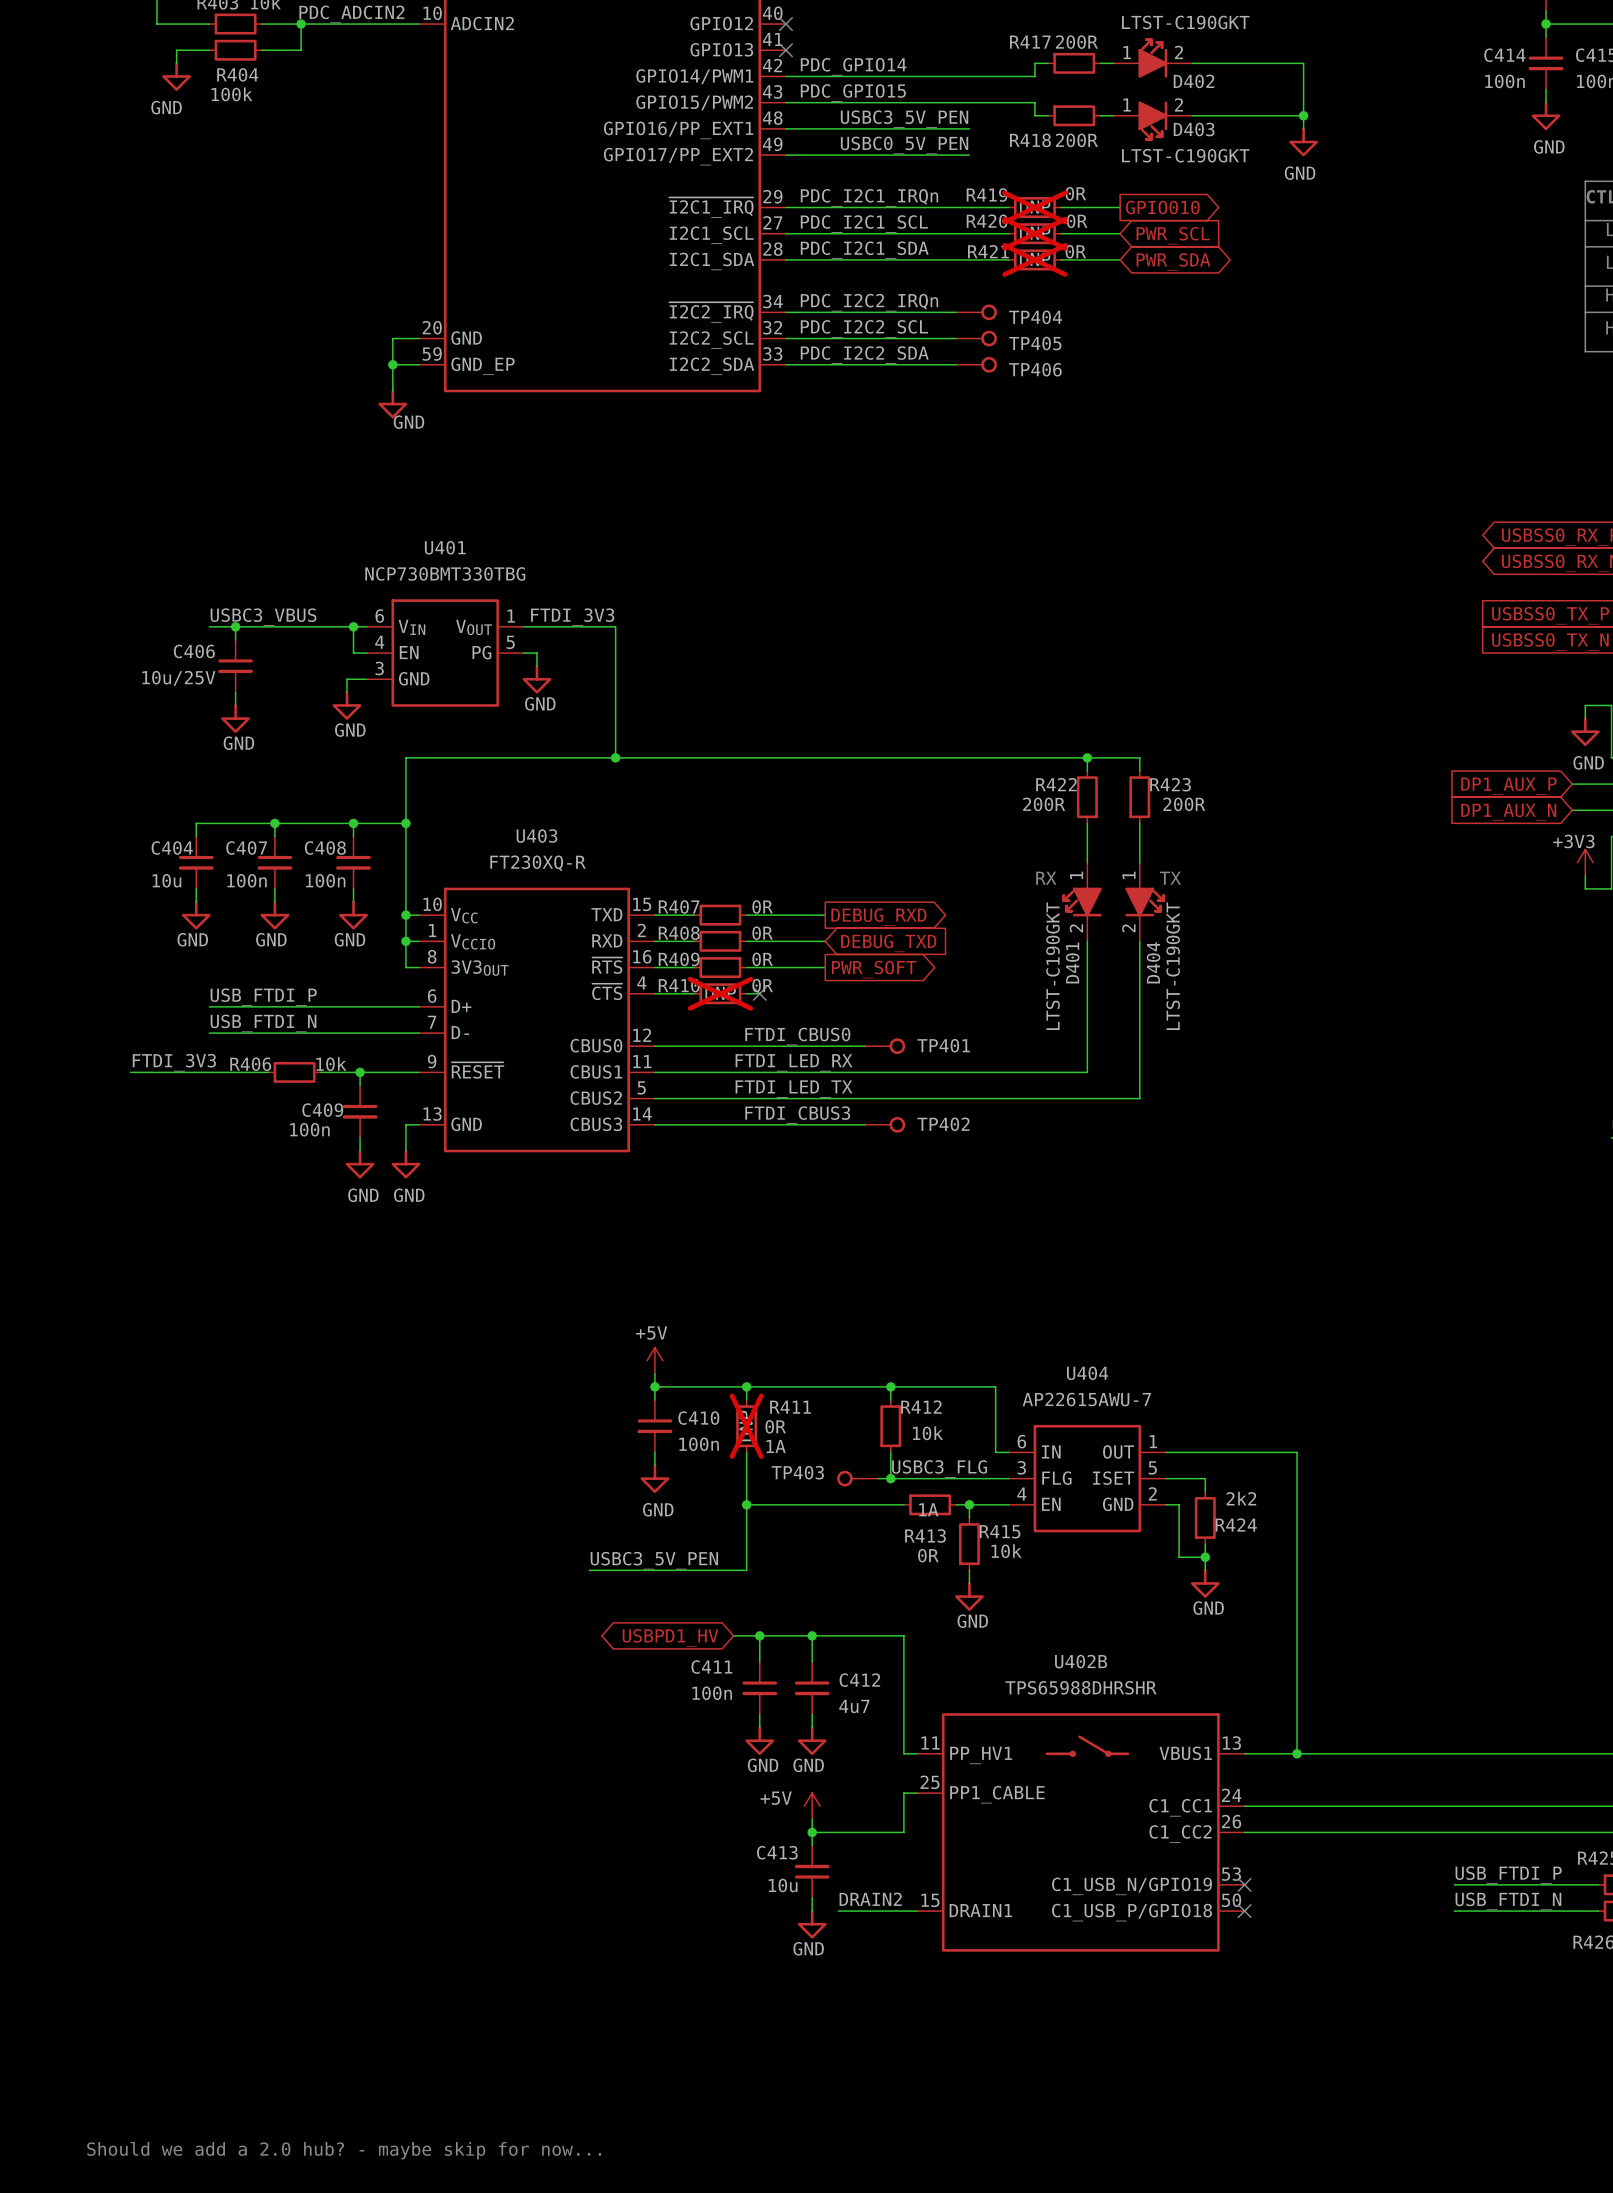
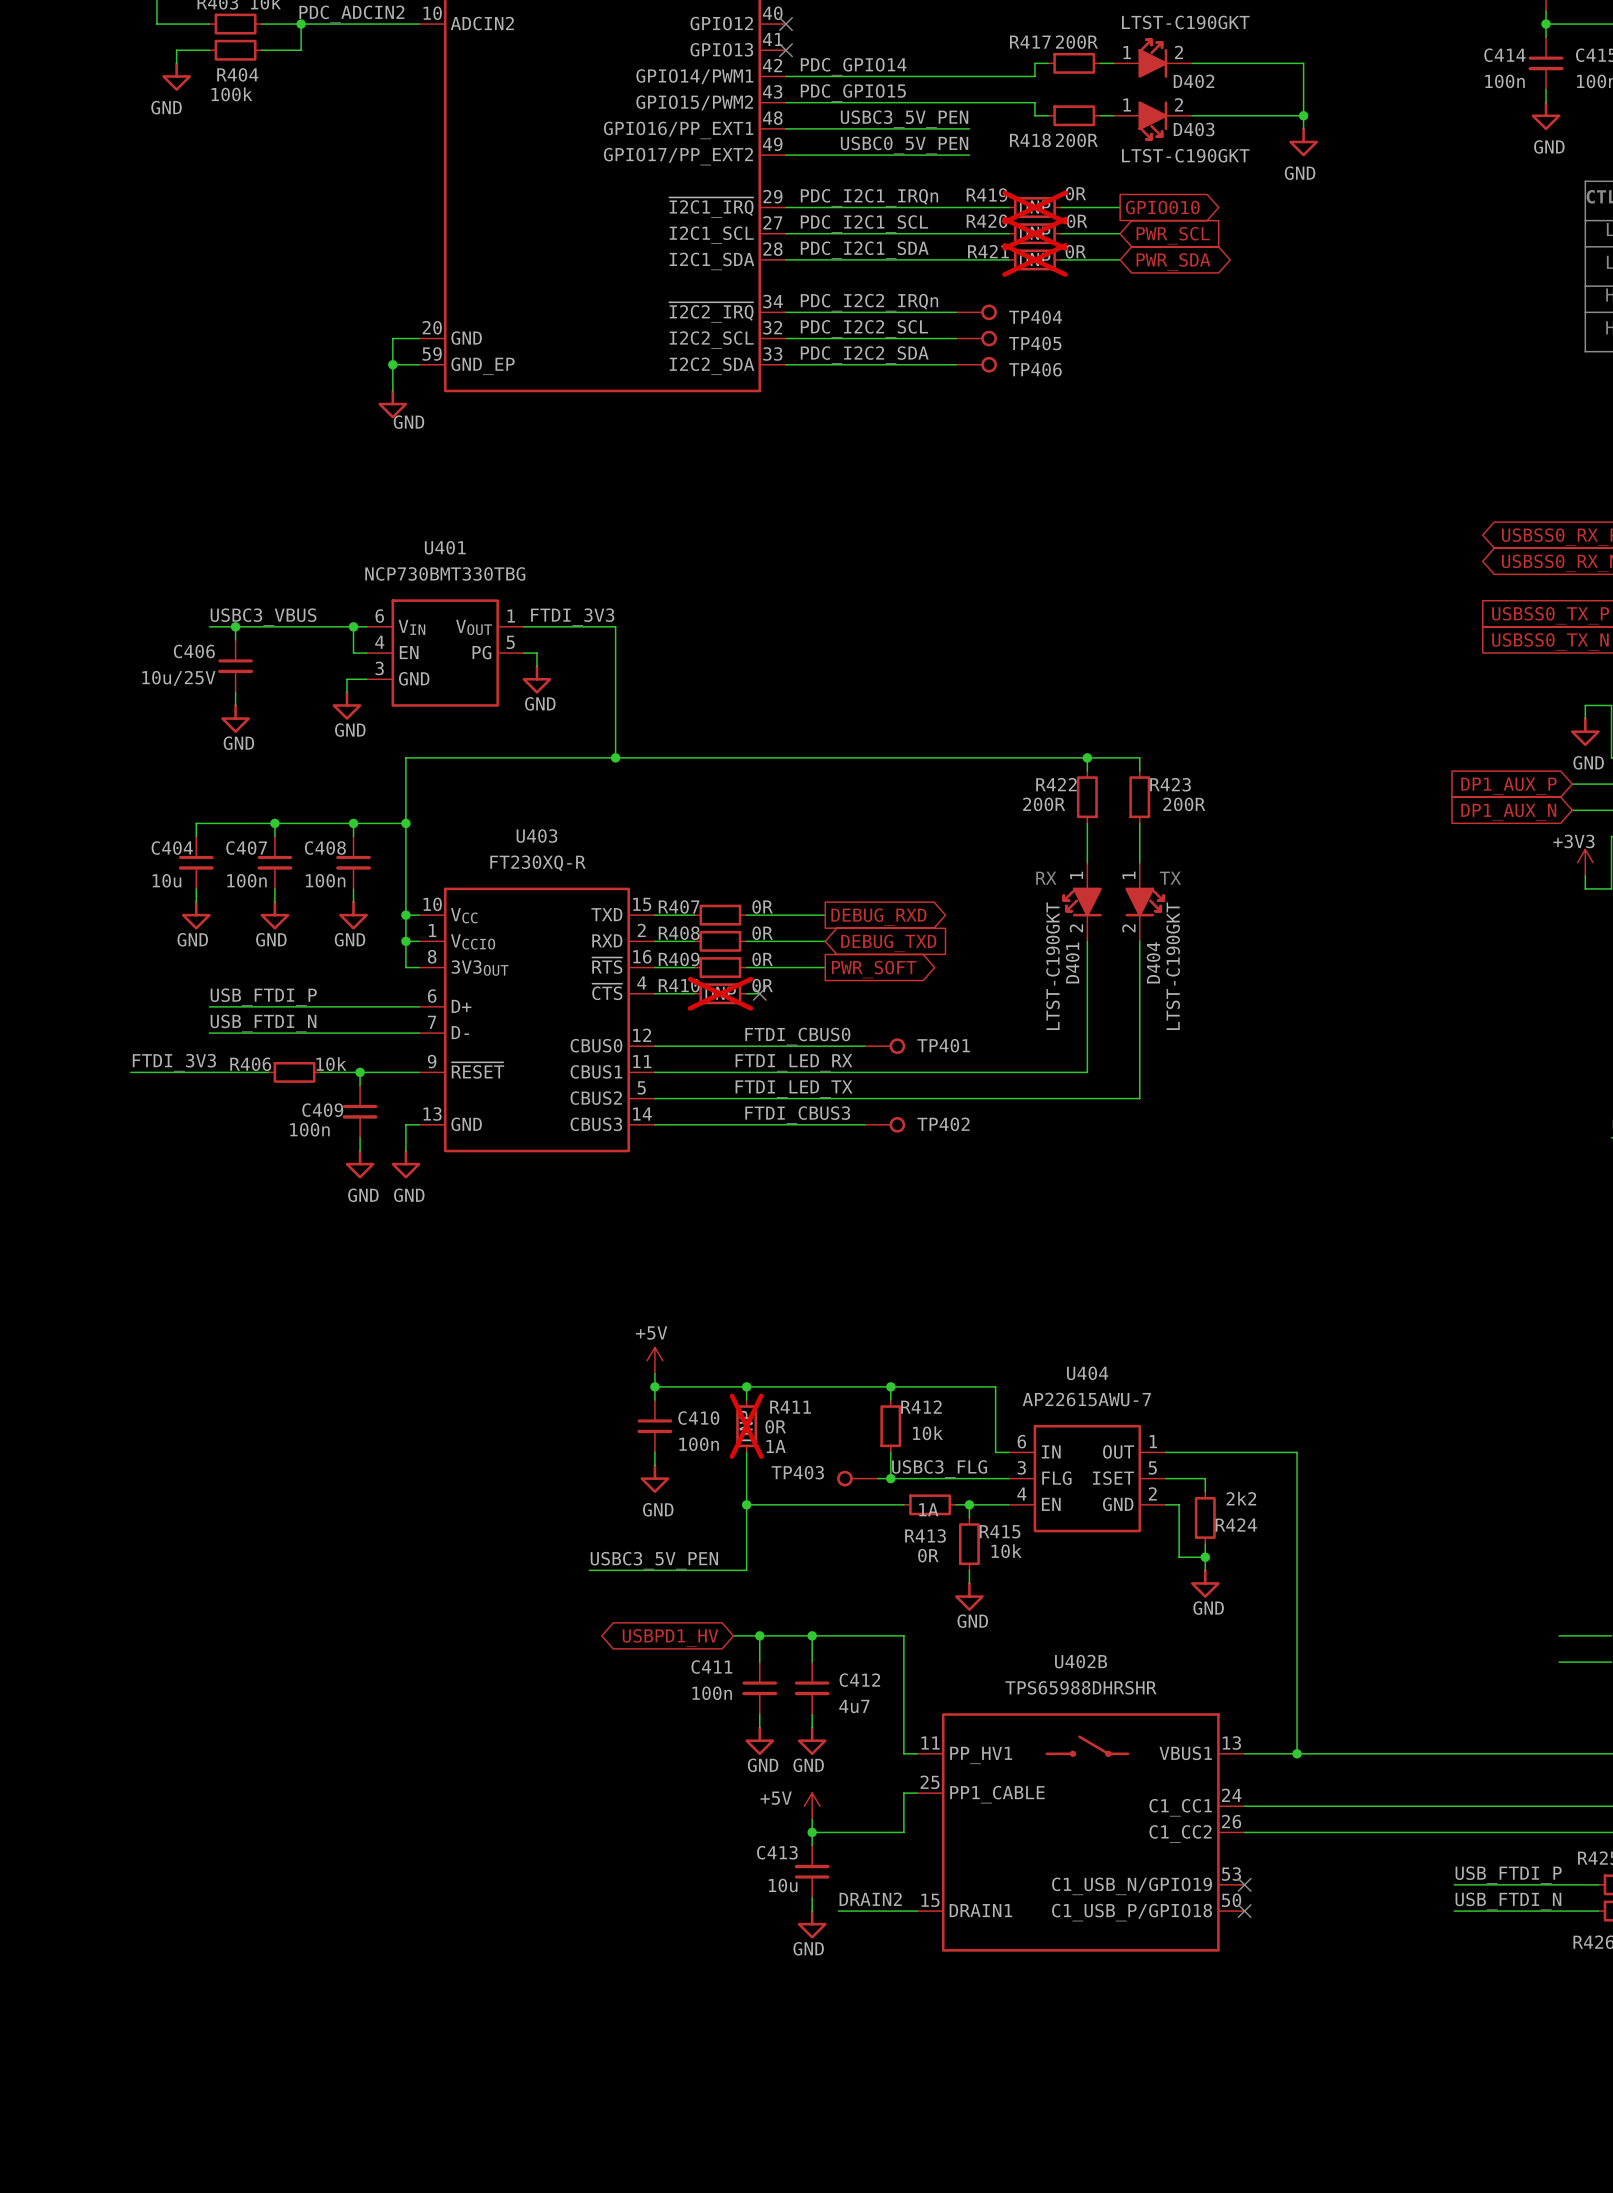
wire: none -> (1559, 1635) (1611, 1635)
wire: none -> (1559, 1662) (1611, 1662)
text: Should we add a 2.0 hub? - maybe skip for now... (344, 2150) -> none

